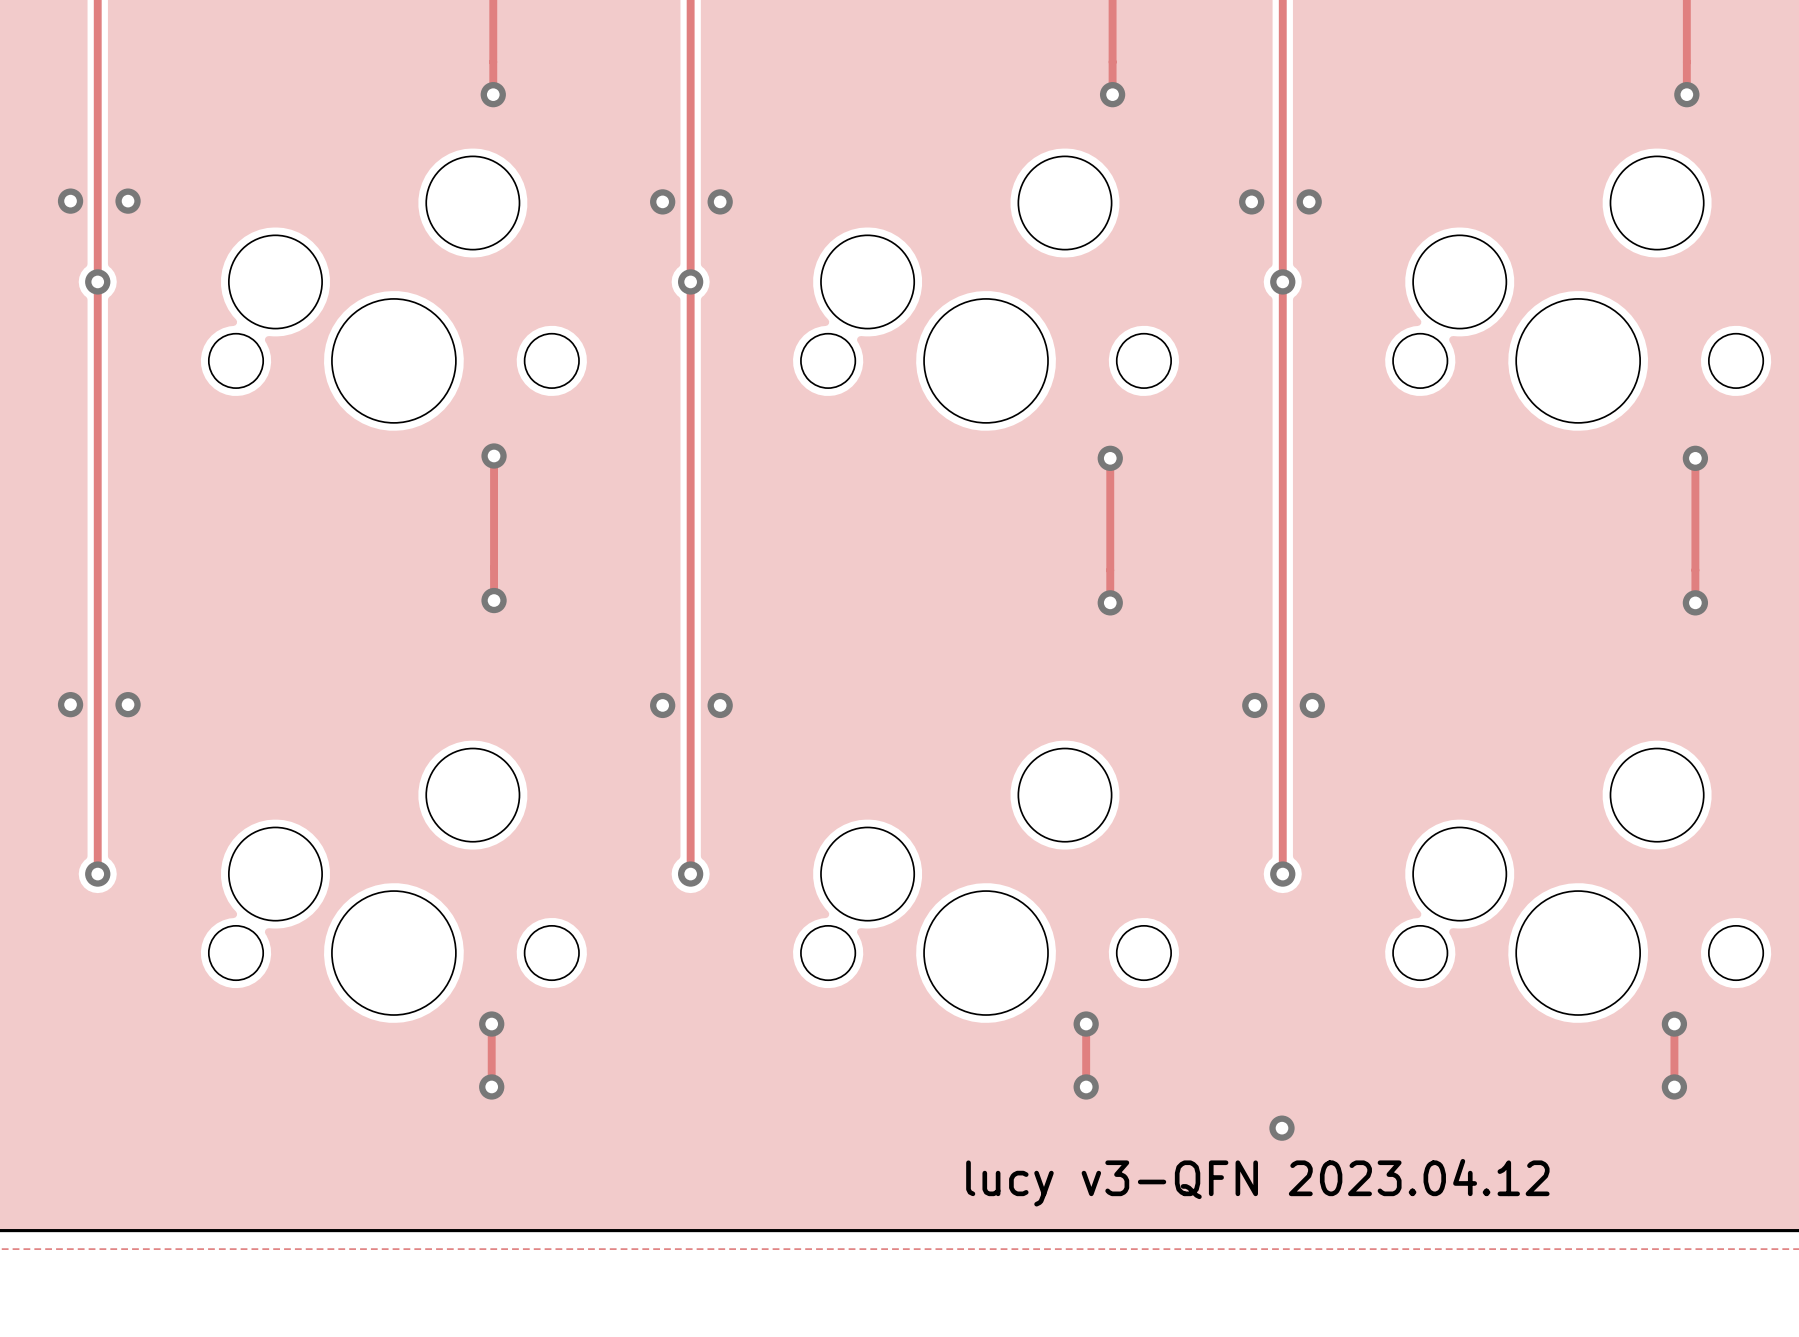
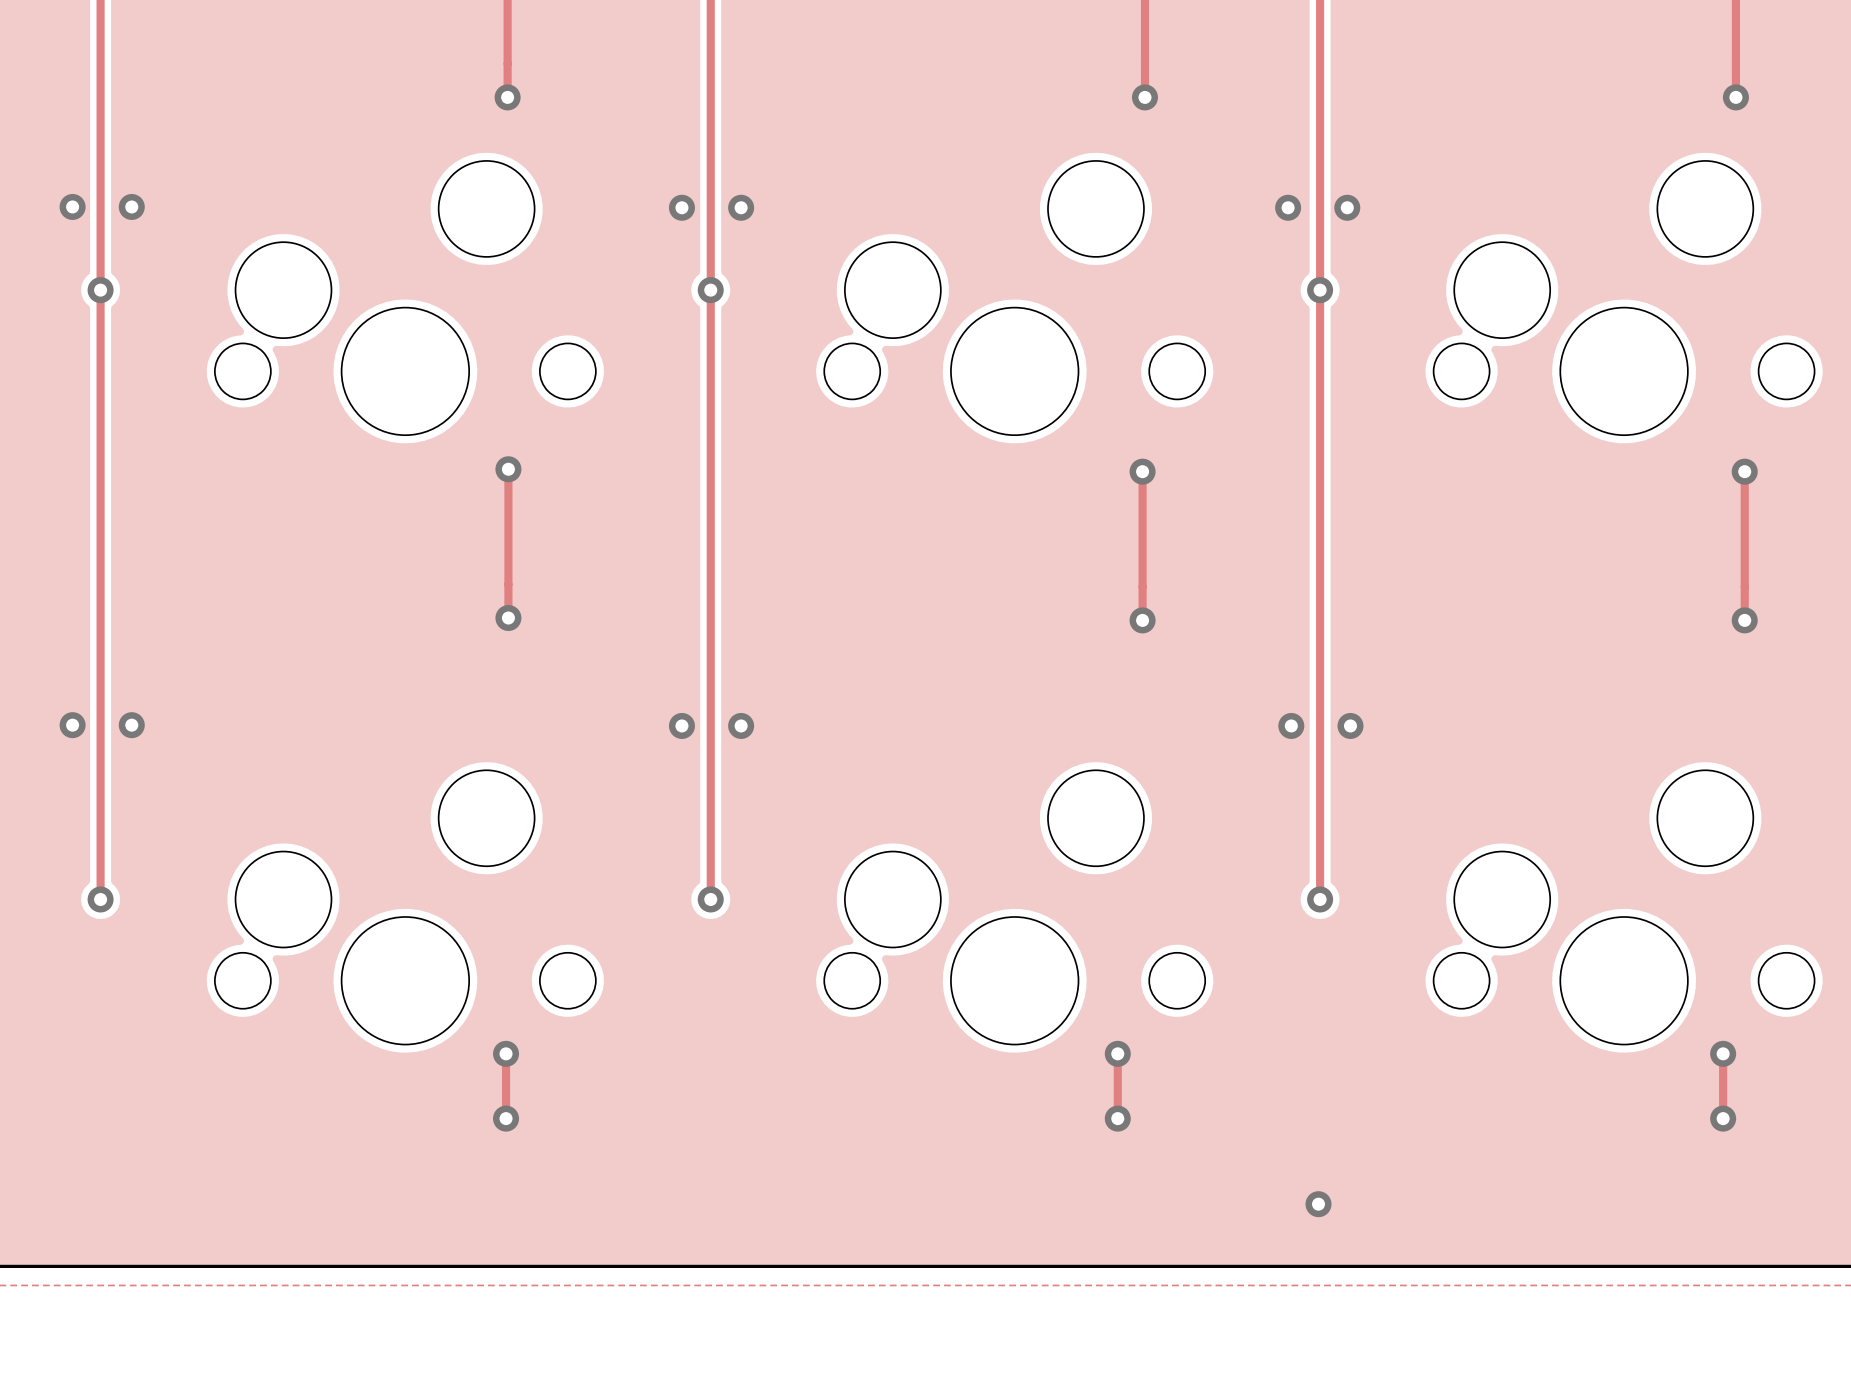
via position: (1281, 1128) -> (1318, 1204)
text: lucy v3-QFN 2023.04.12 (1257, 1182) -> none

